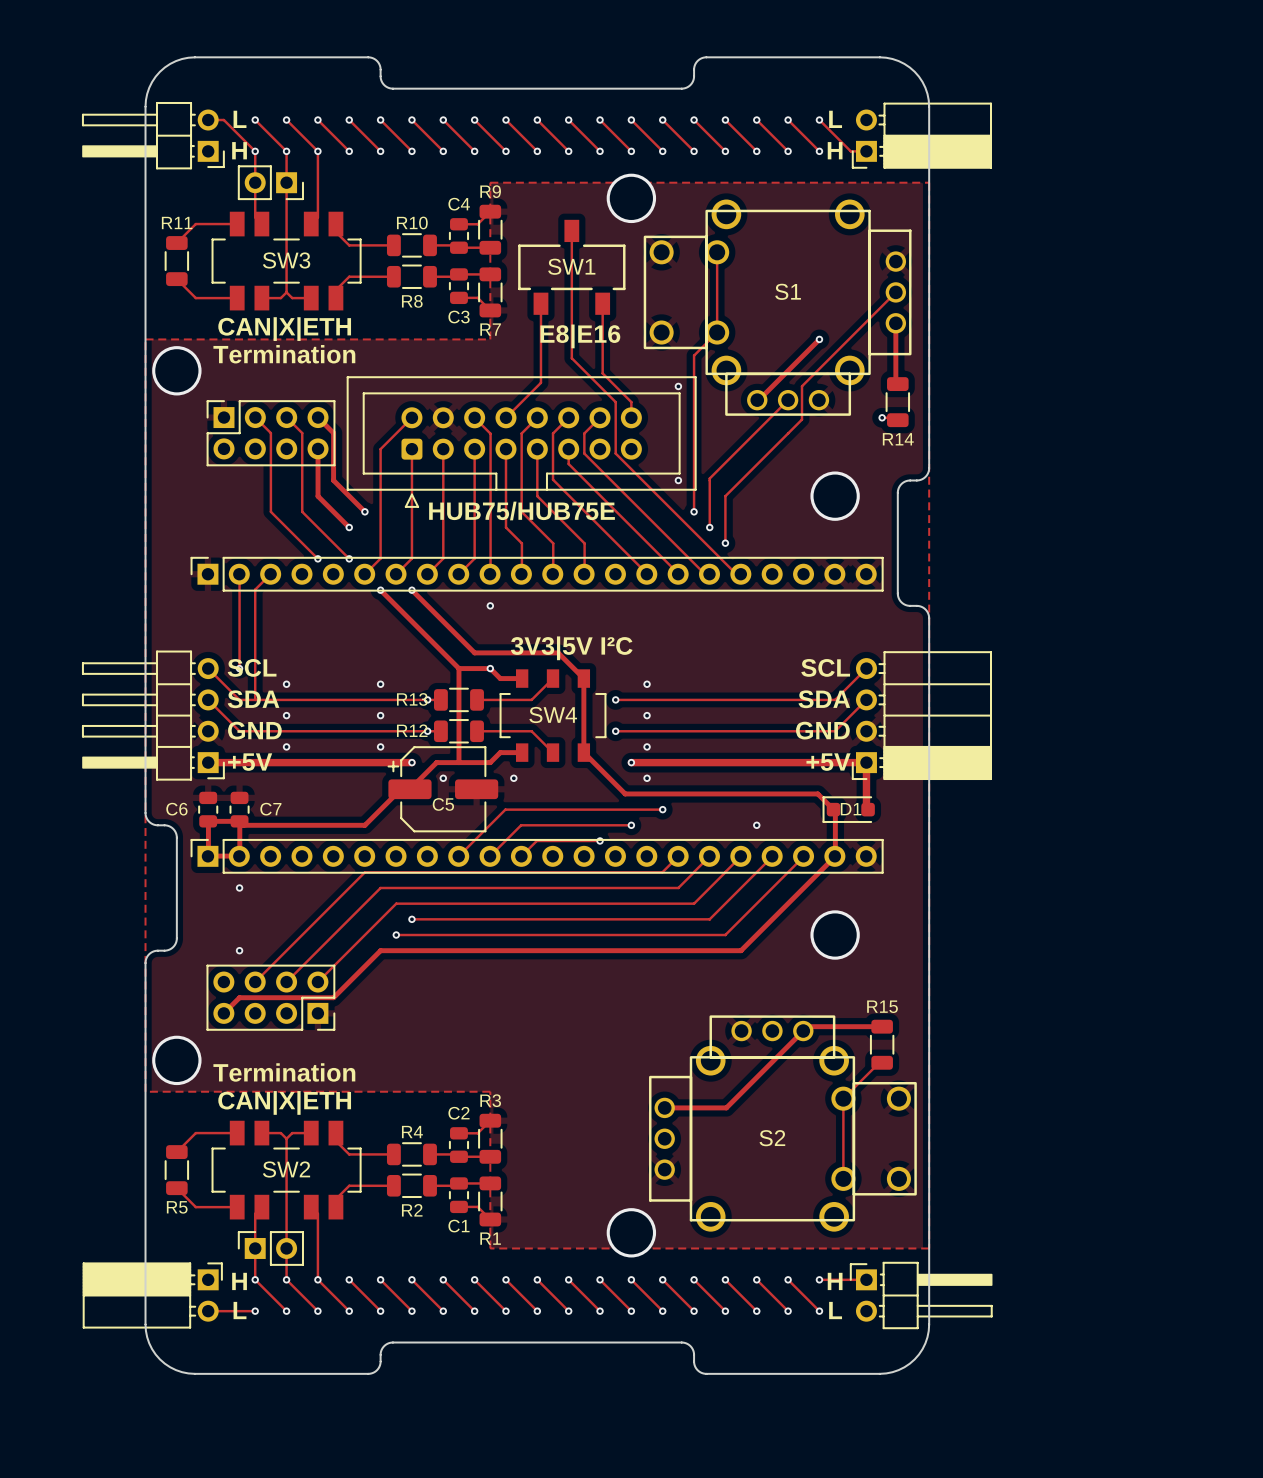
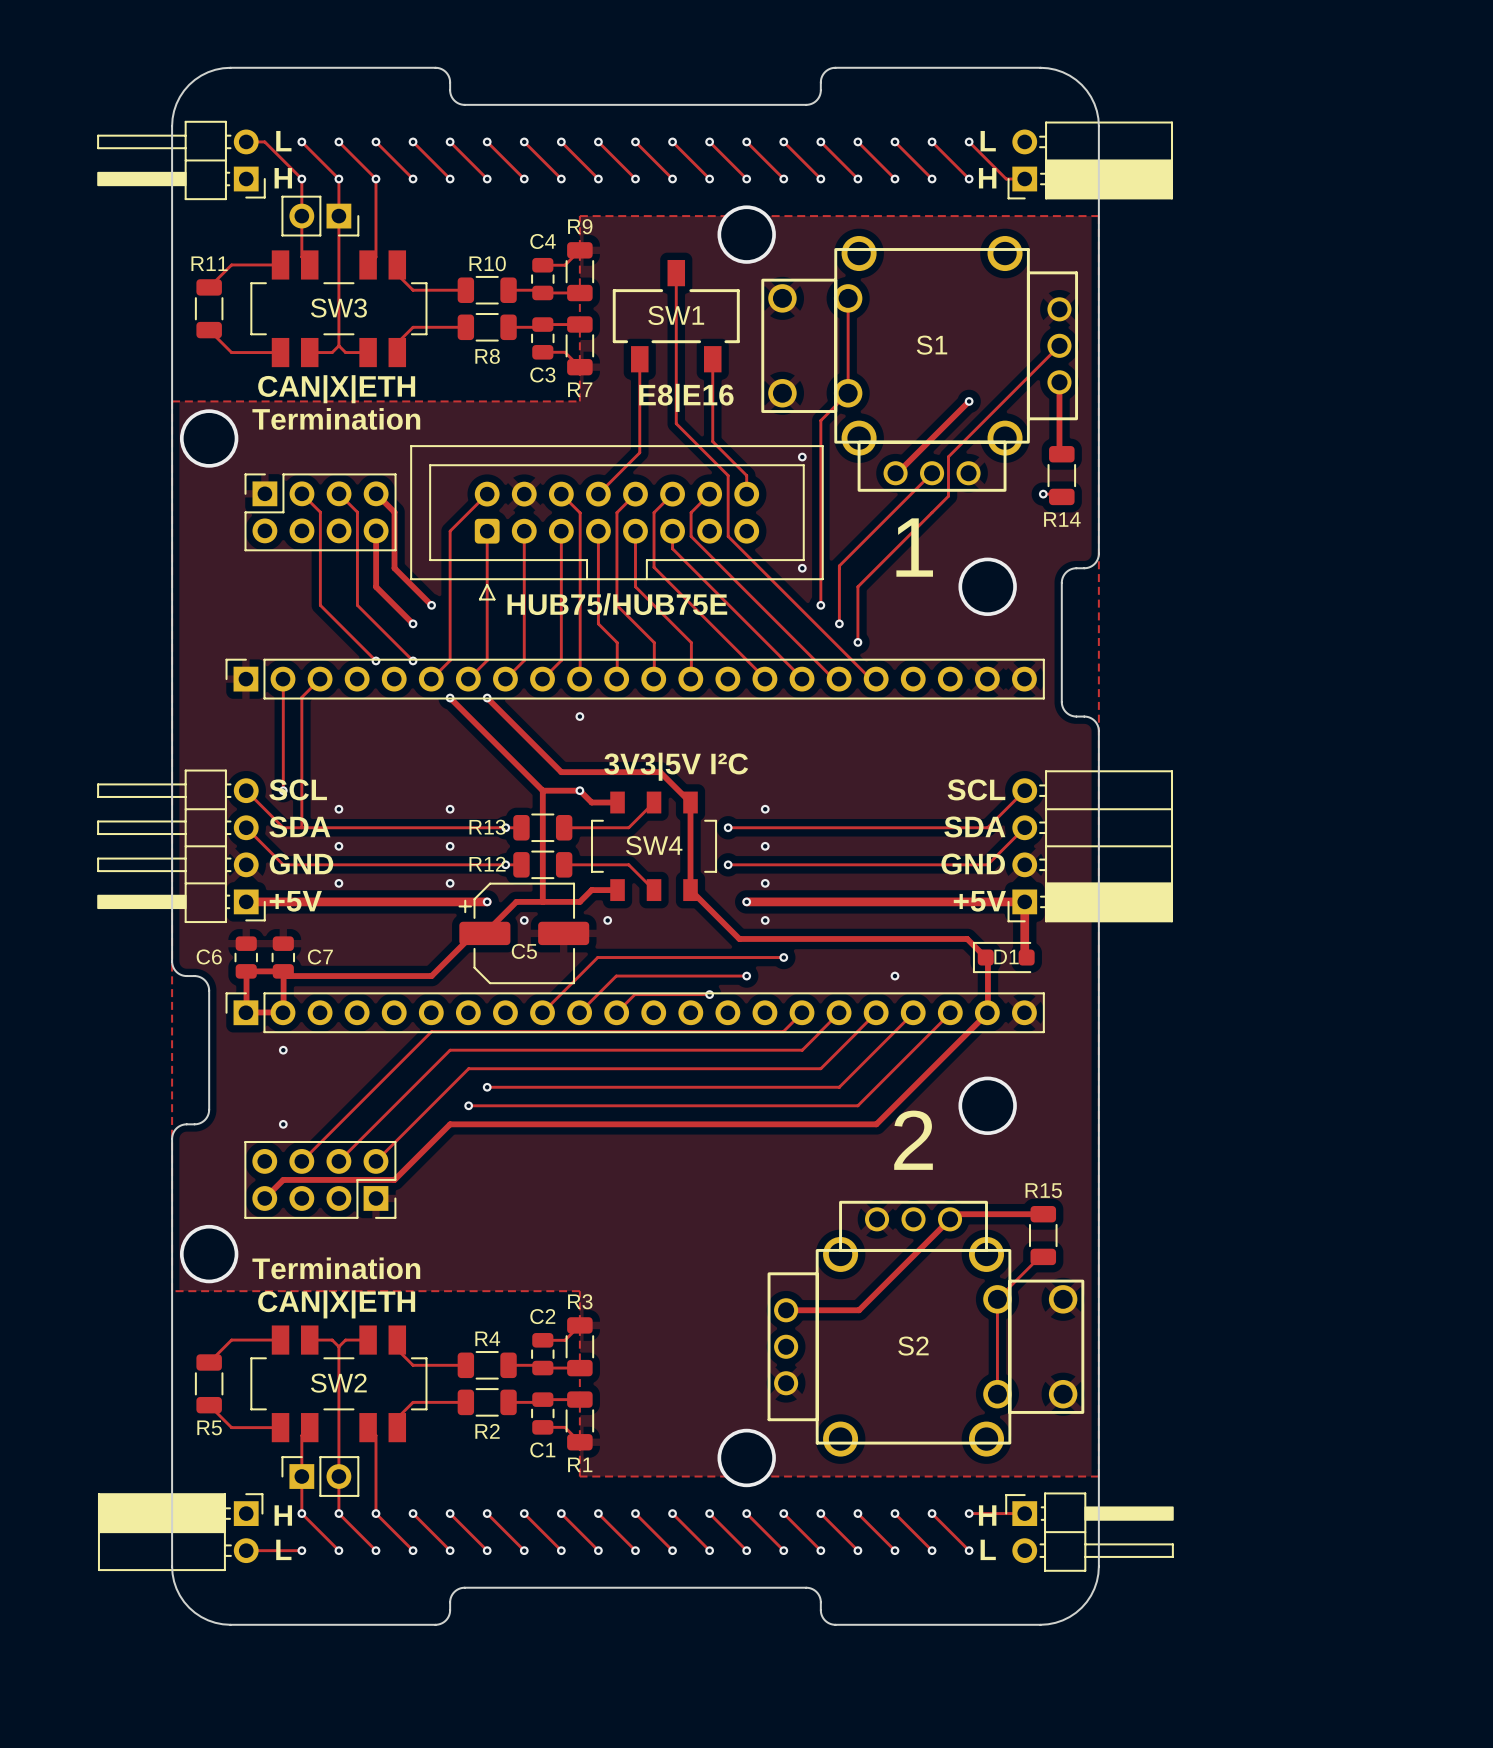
text: none -> 1 (914, 547)
text: none -> 2 (913, 1140)

